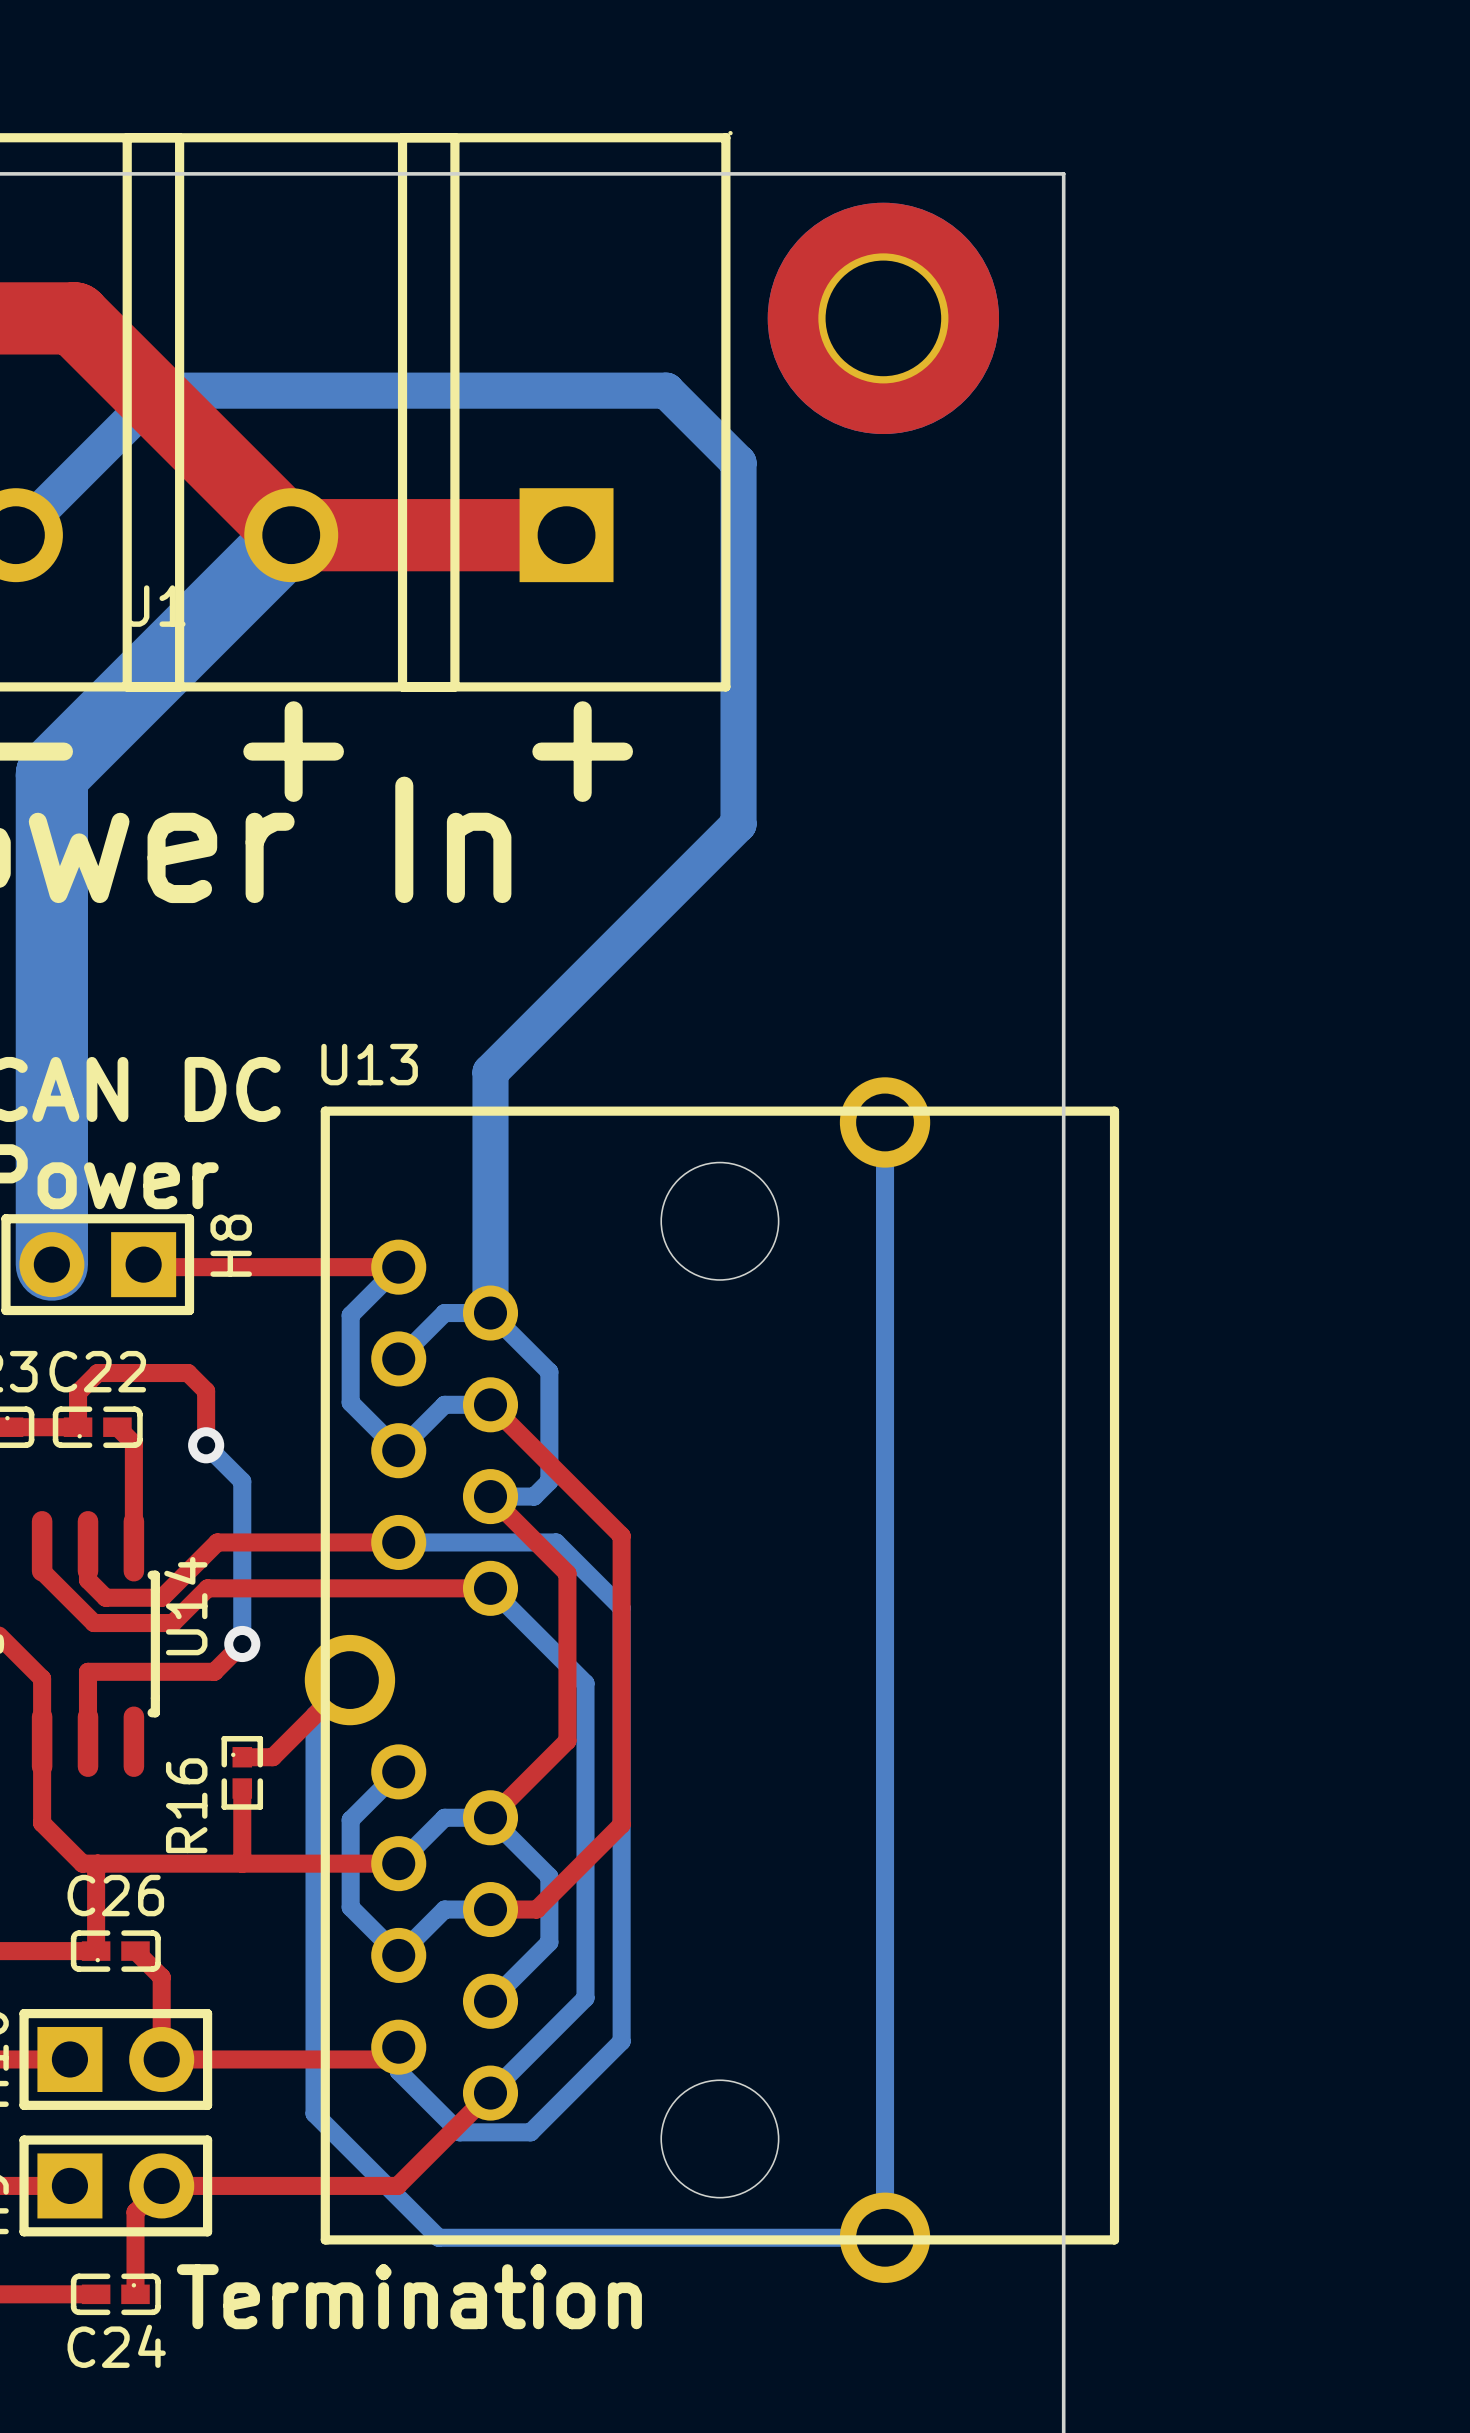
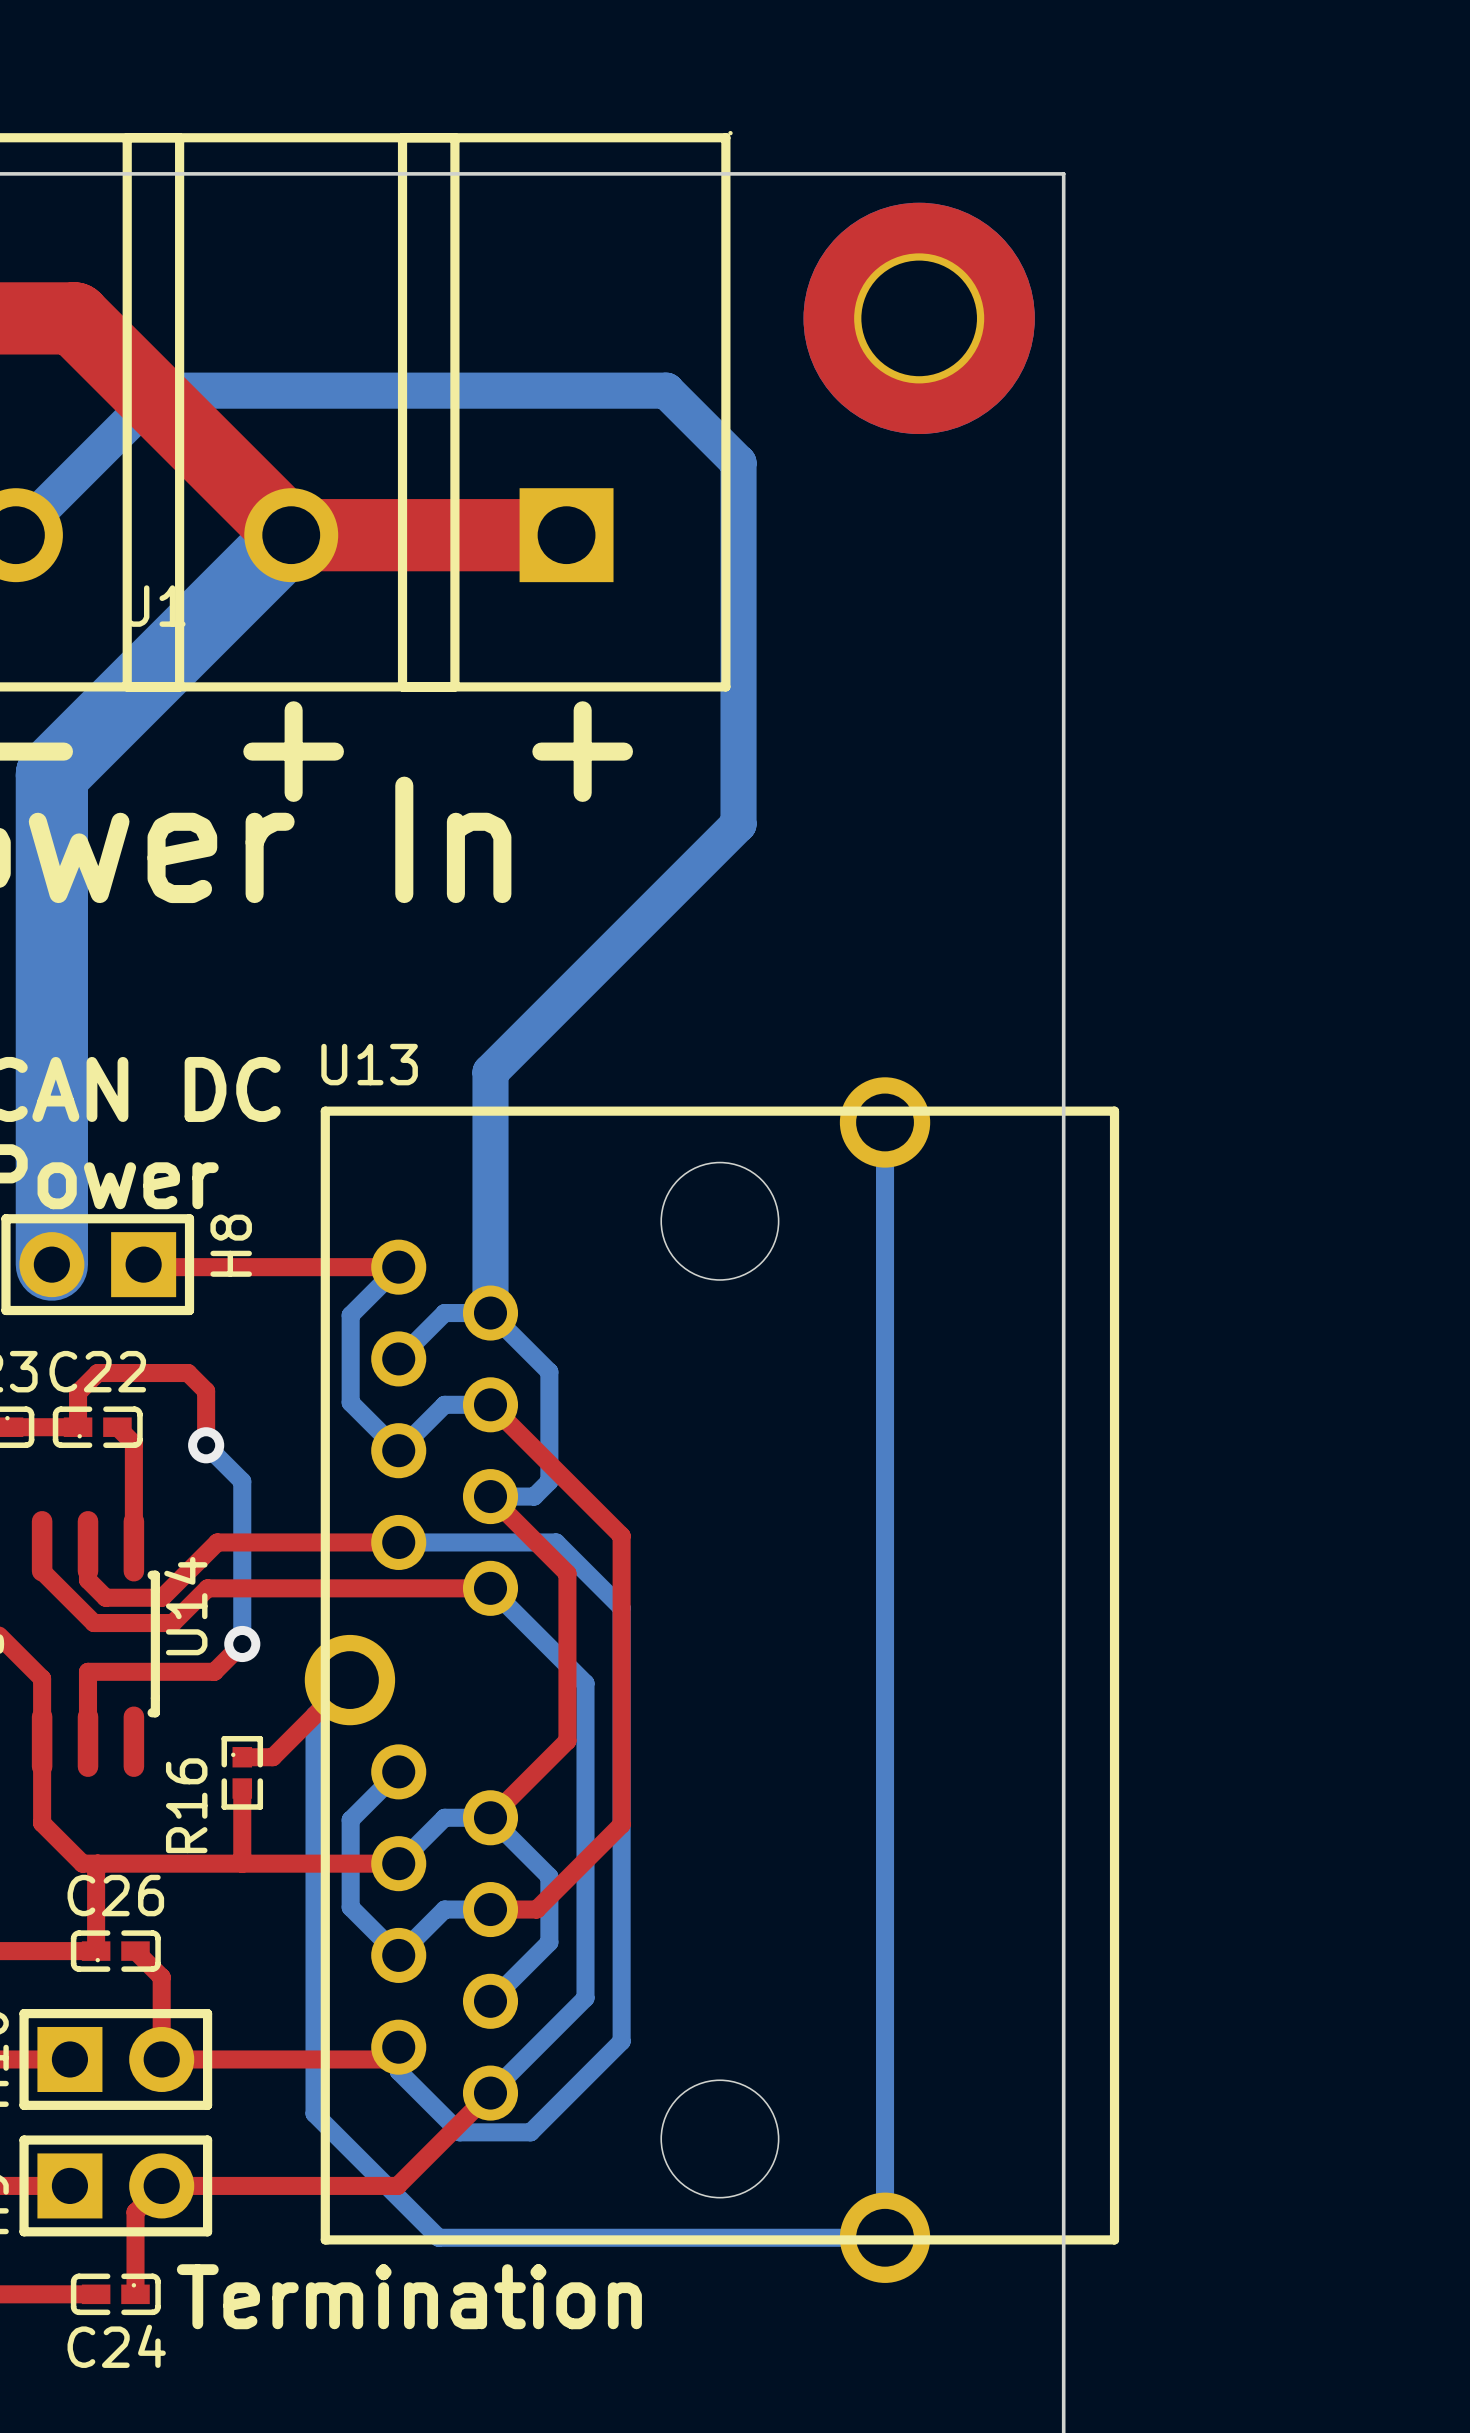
part position: (883, 318) -> (919, 318)

